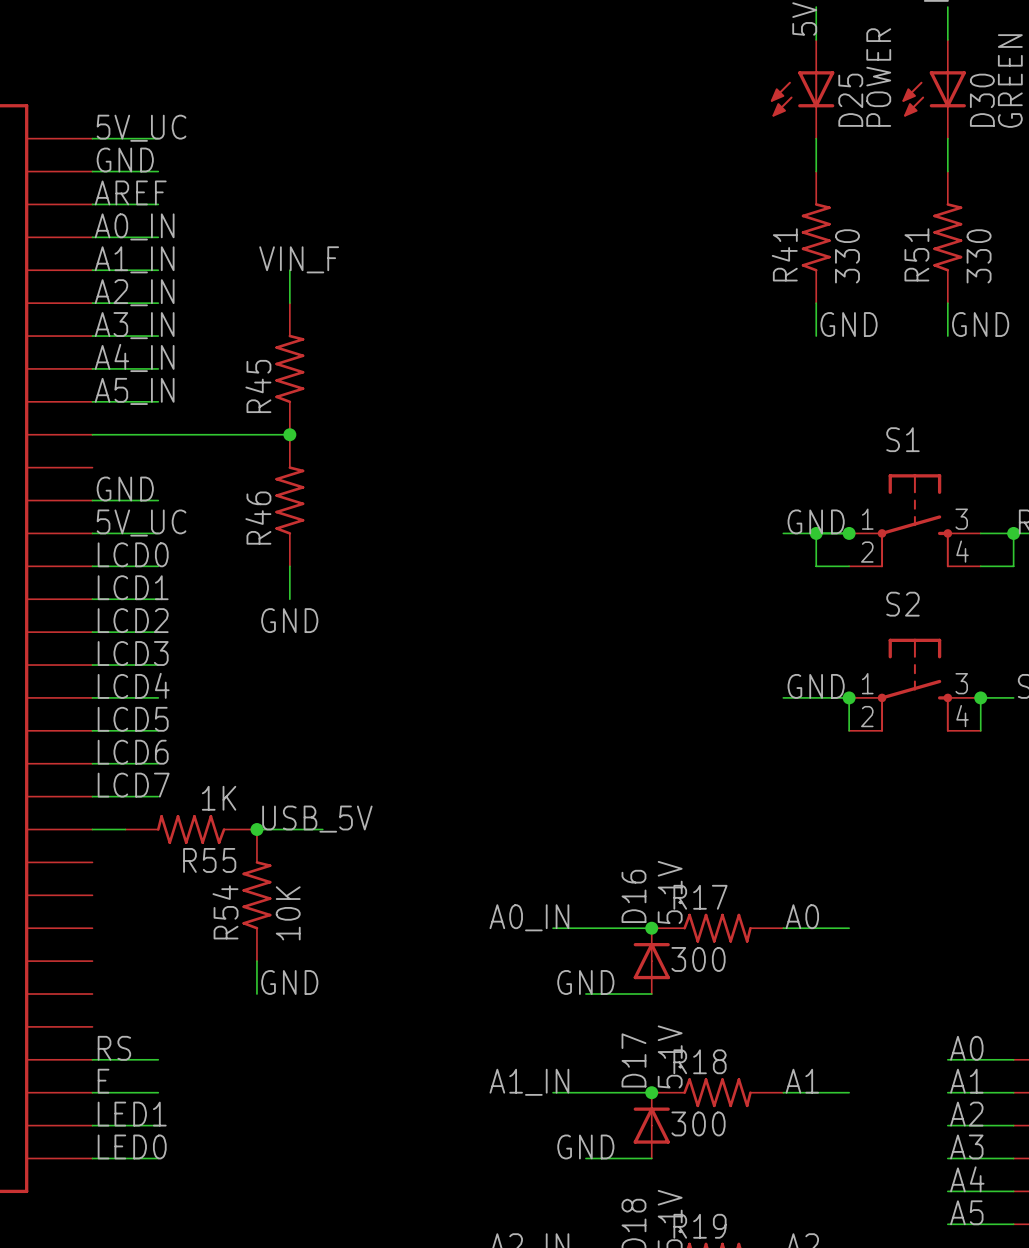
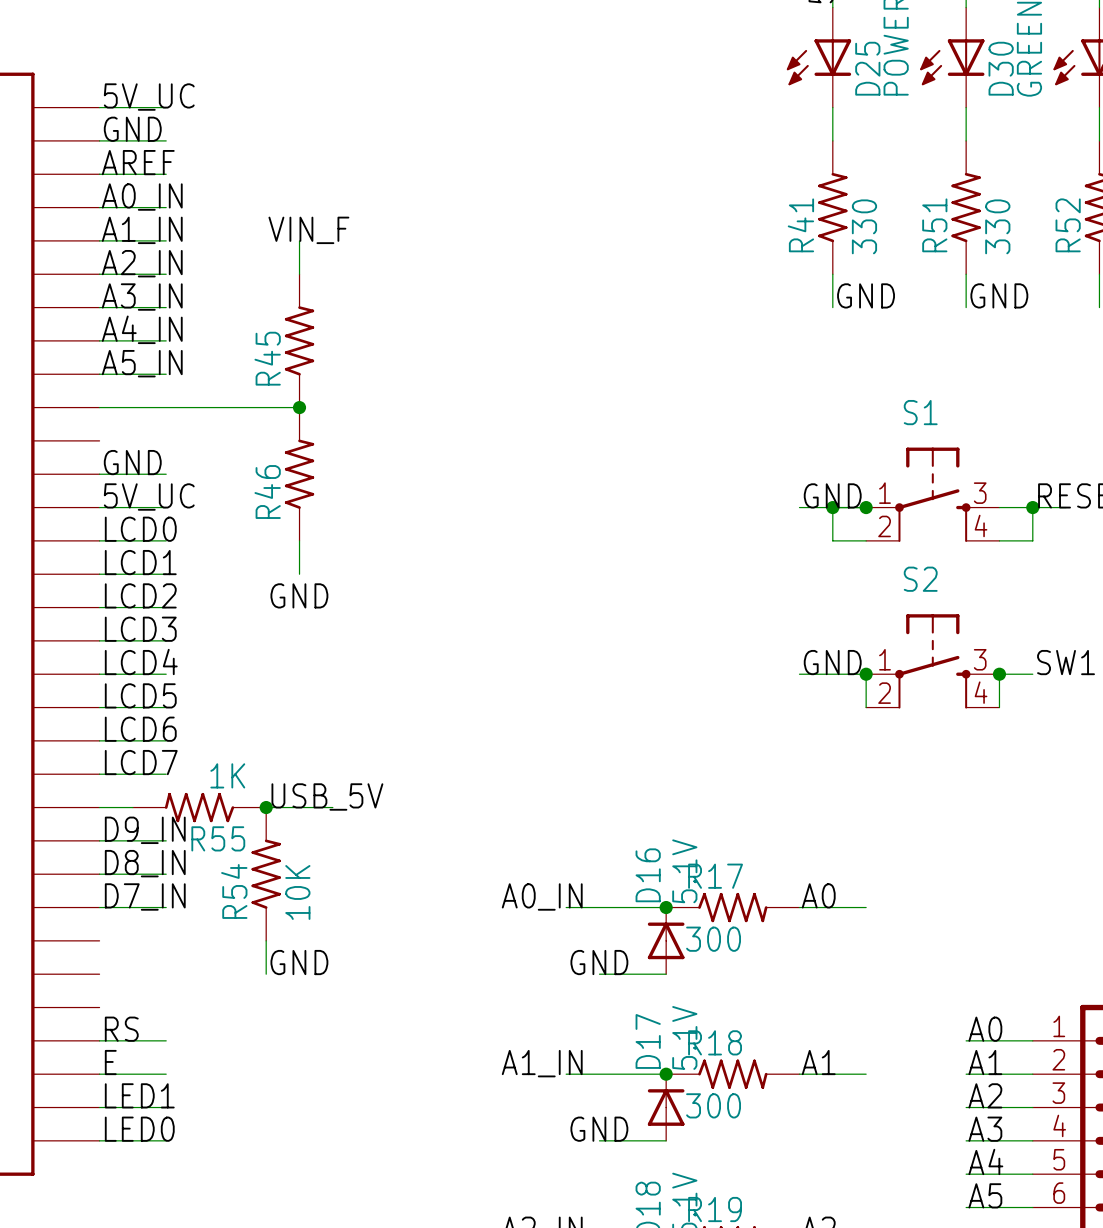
label: none -> D9_IN (145, 830)
wire: none -> (99, 840) (166, 840)
label: none -> D8_IN (145, 863)
wire: none -> (99, 874) (166, 874)
label: none -> D7_IN (145, 896)
wire: none -> (99, 907) (166, 907)

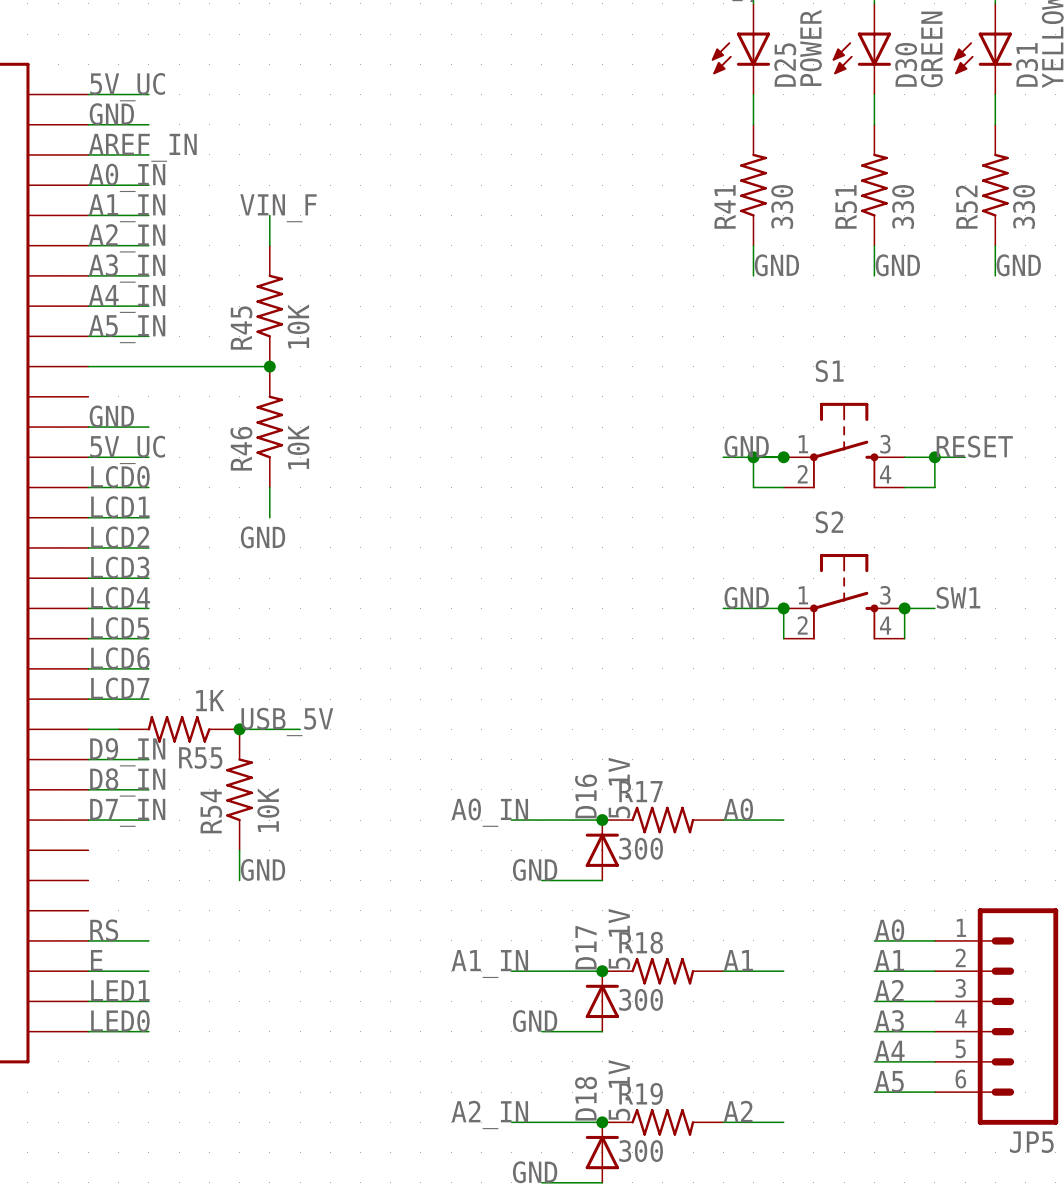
label: AREF (138, 162) -> AREF_IN (142, 147)
R45 value: none -> 10K (298, 326)
R46 value: none -> 10K (298, 447)

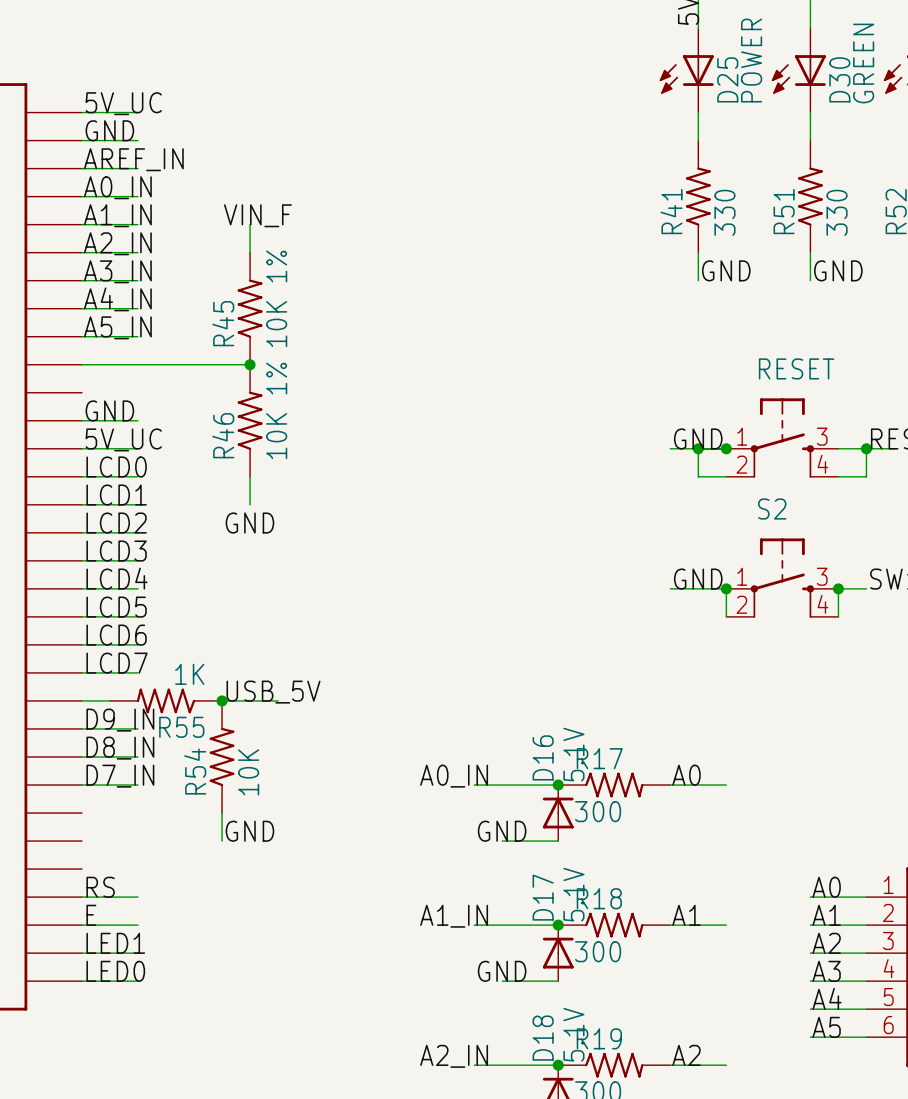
R45 value: 10K (298, 326) -> 10K 1% (276, 298)
S1 name: S1 (829, 371) -> RESET (796, 368)
R46 value: 10K (298, 447) -> 10K 1% (276, 410)

